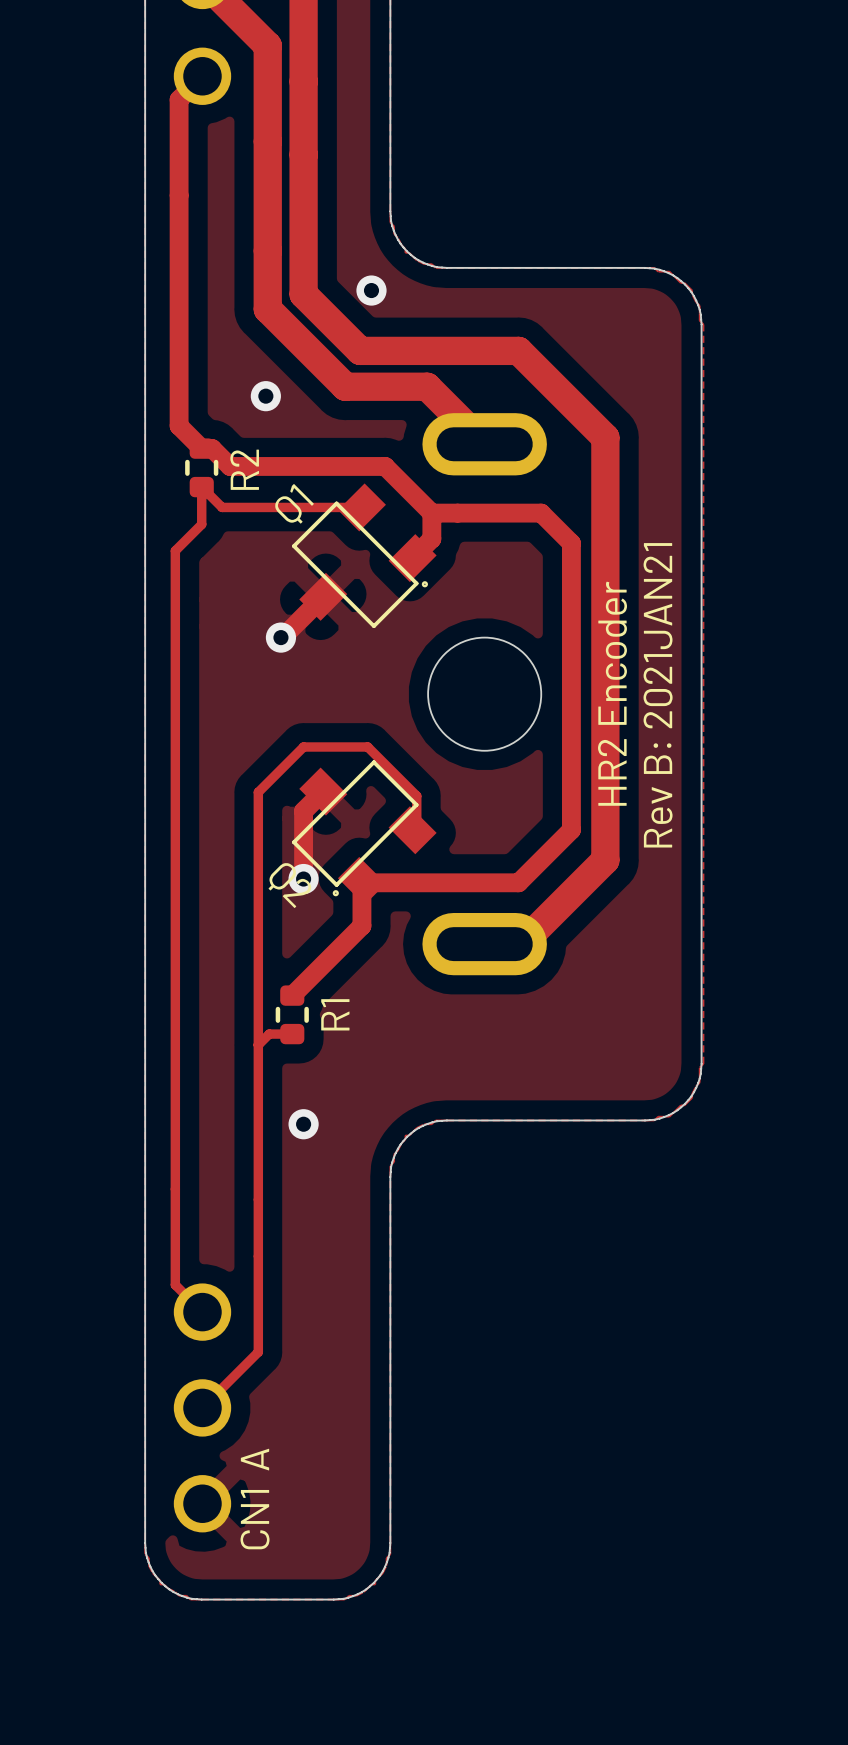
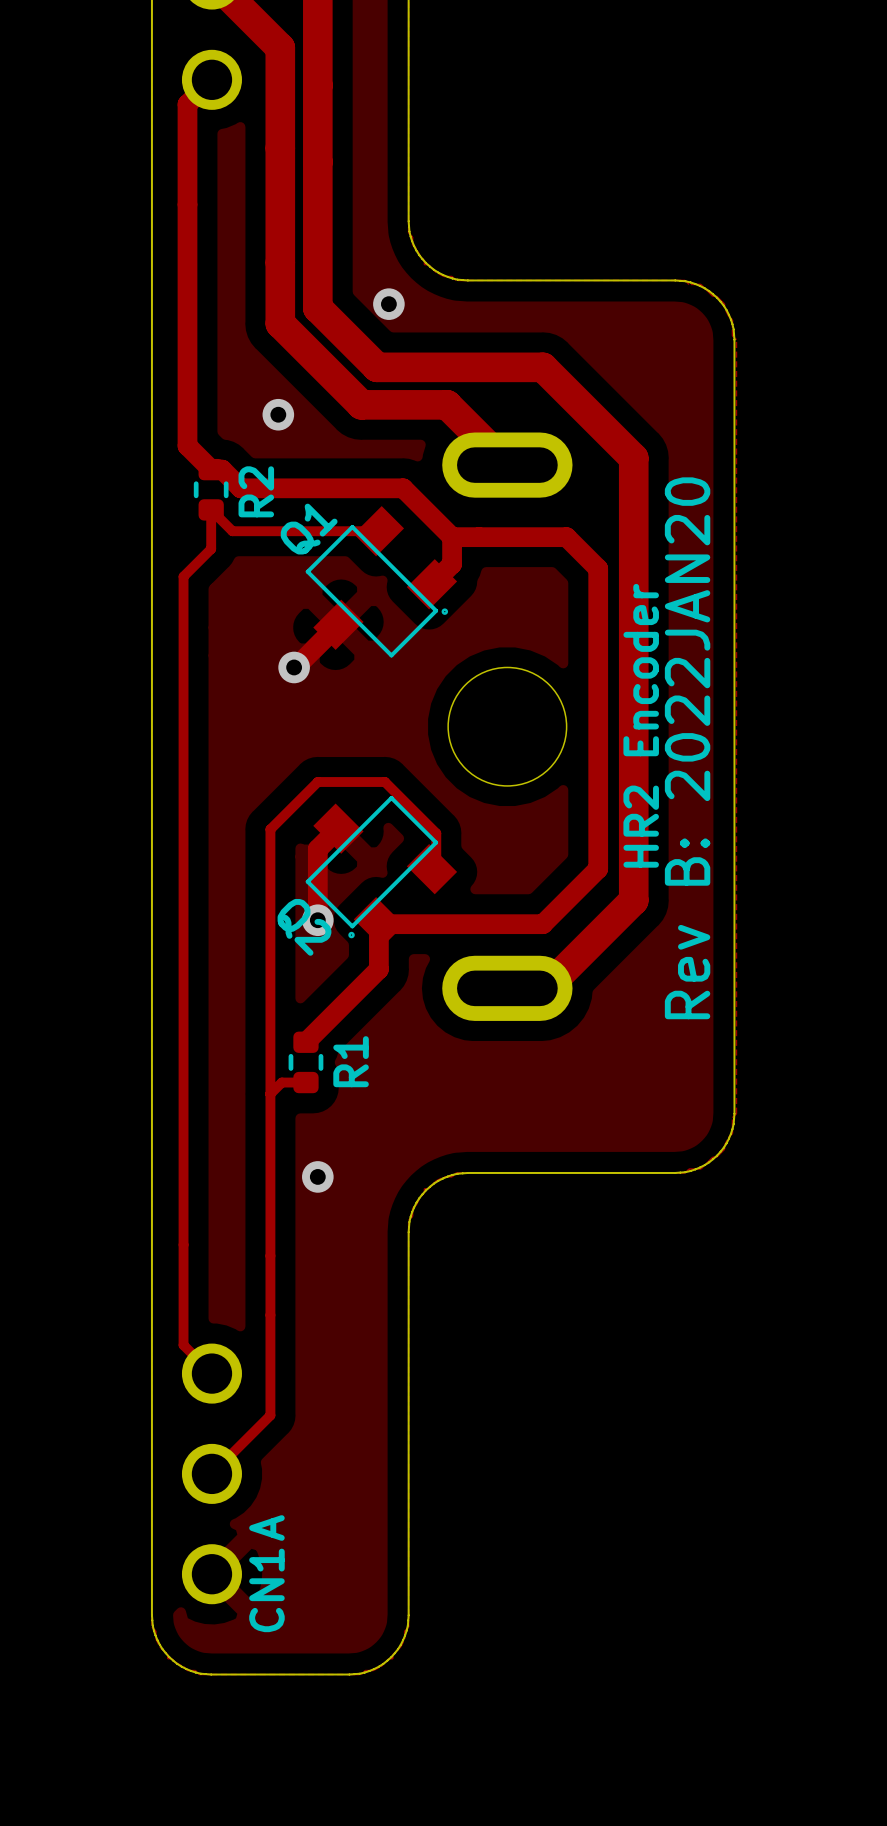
text: Rev B: 2021JAN21 (658, 695) -> Rev B: 2022JAN20 (687, 748)

